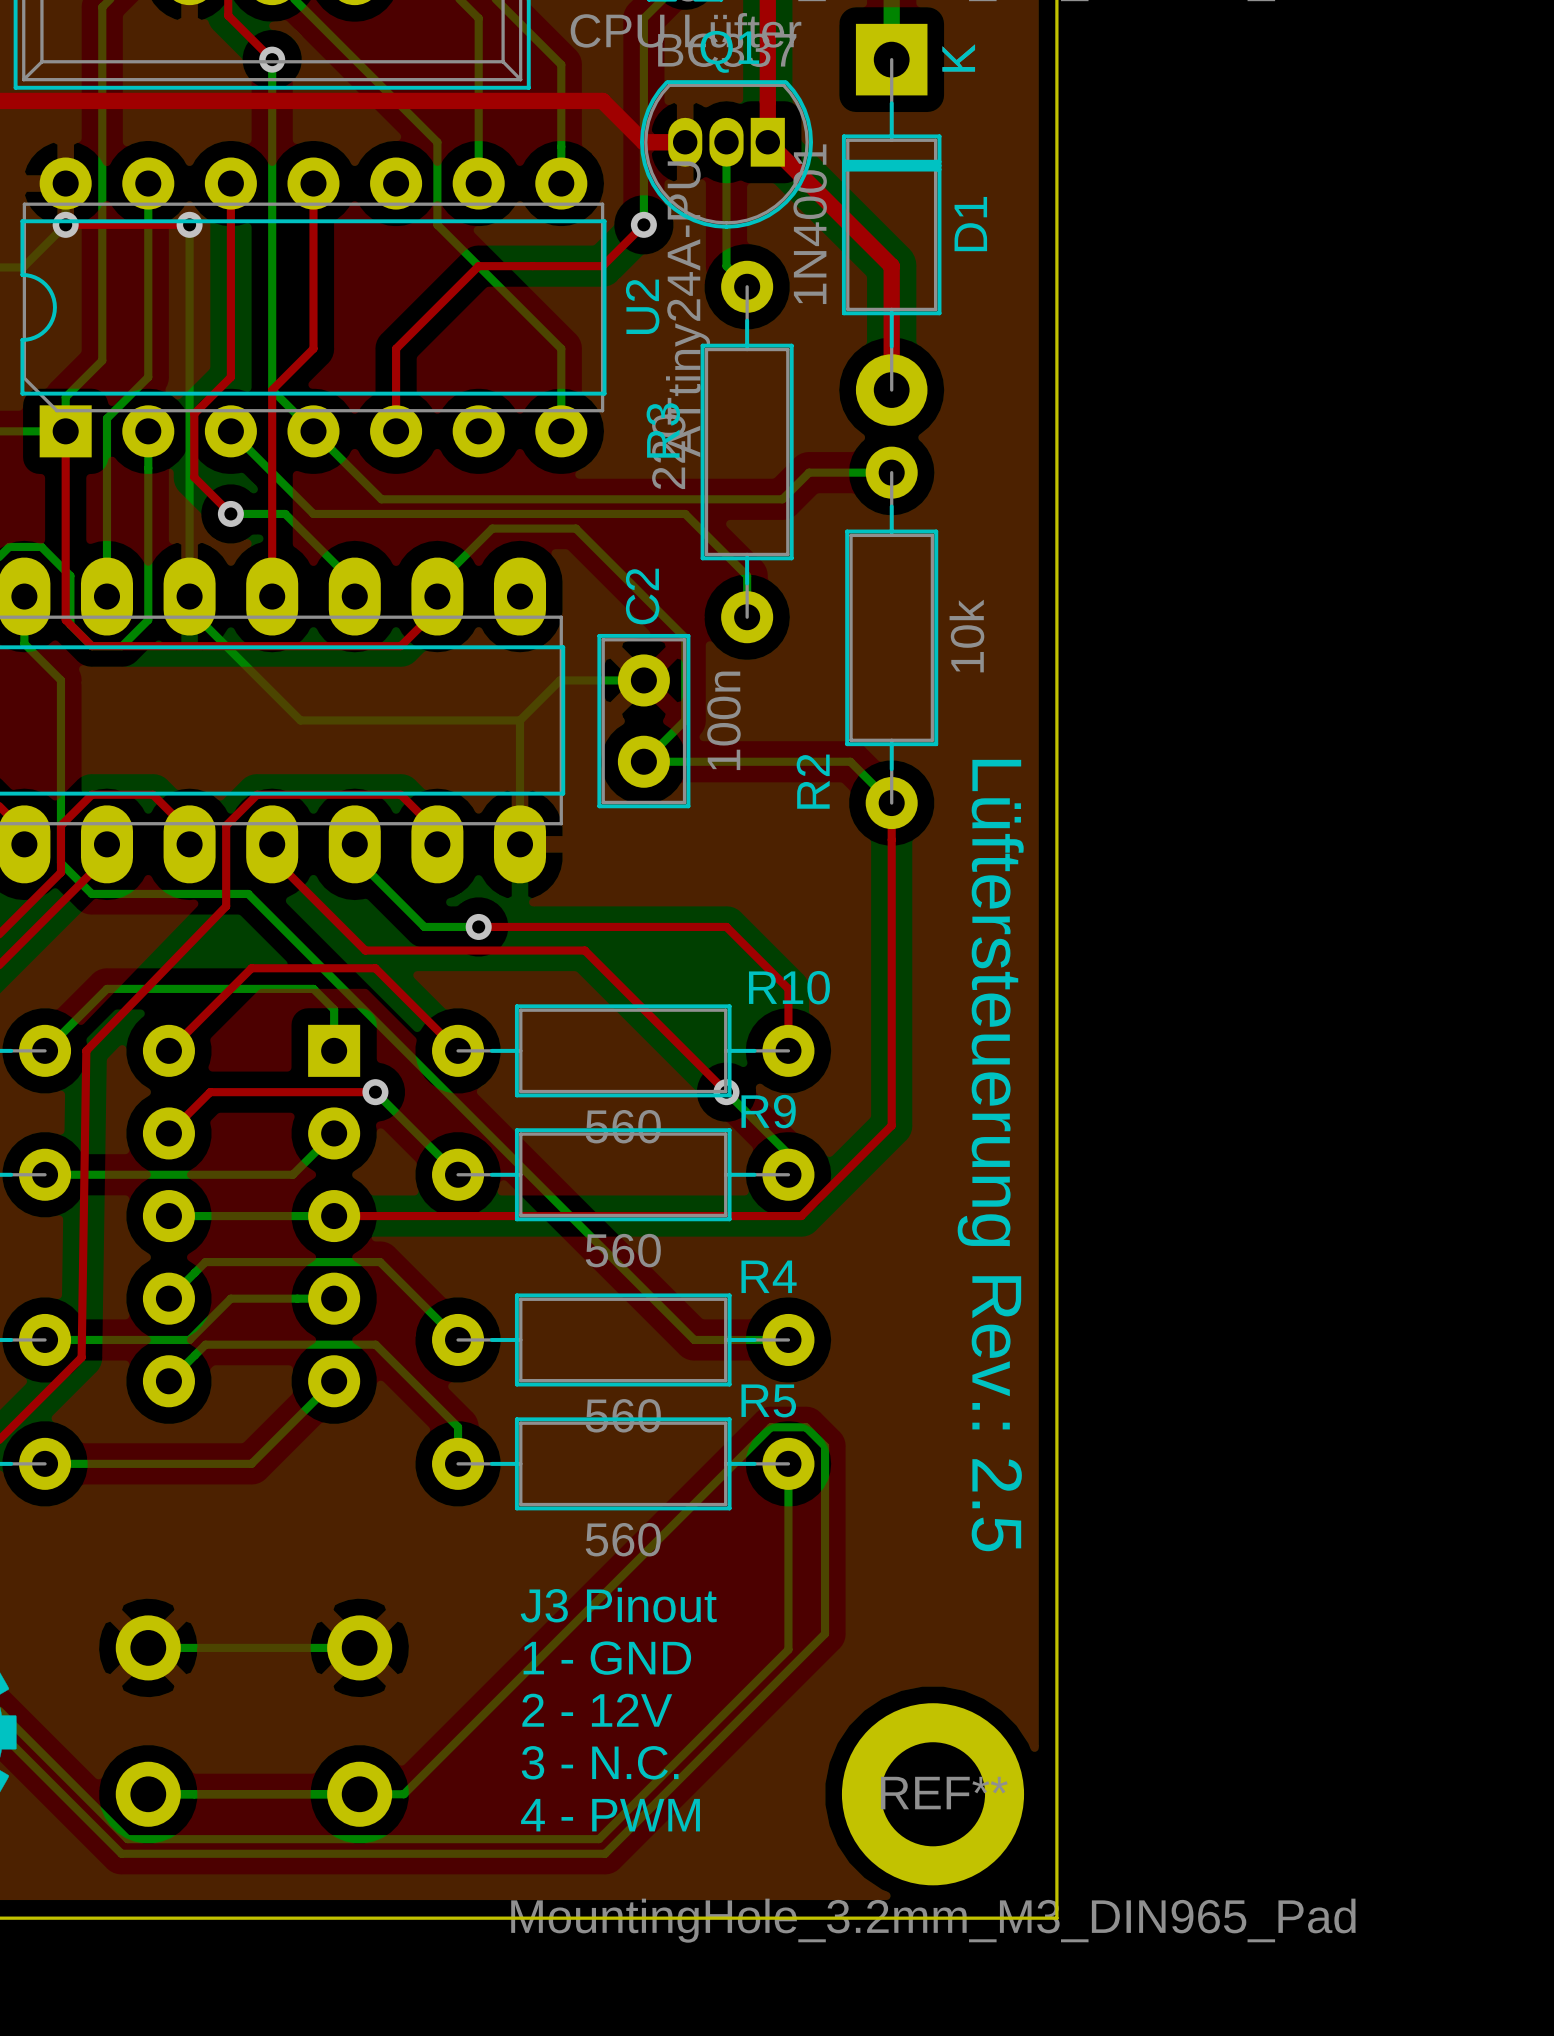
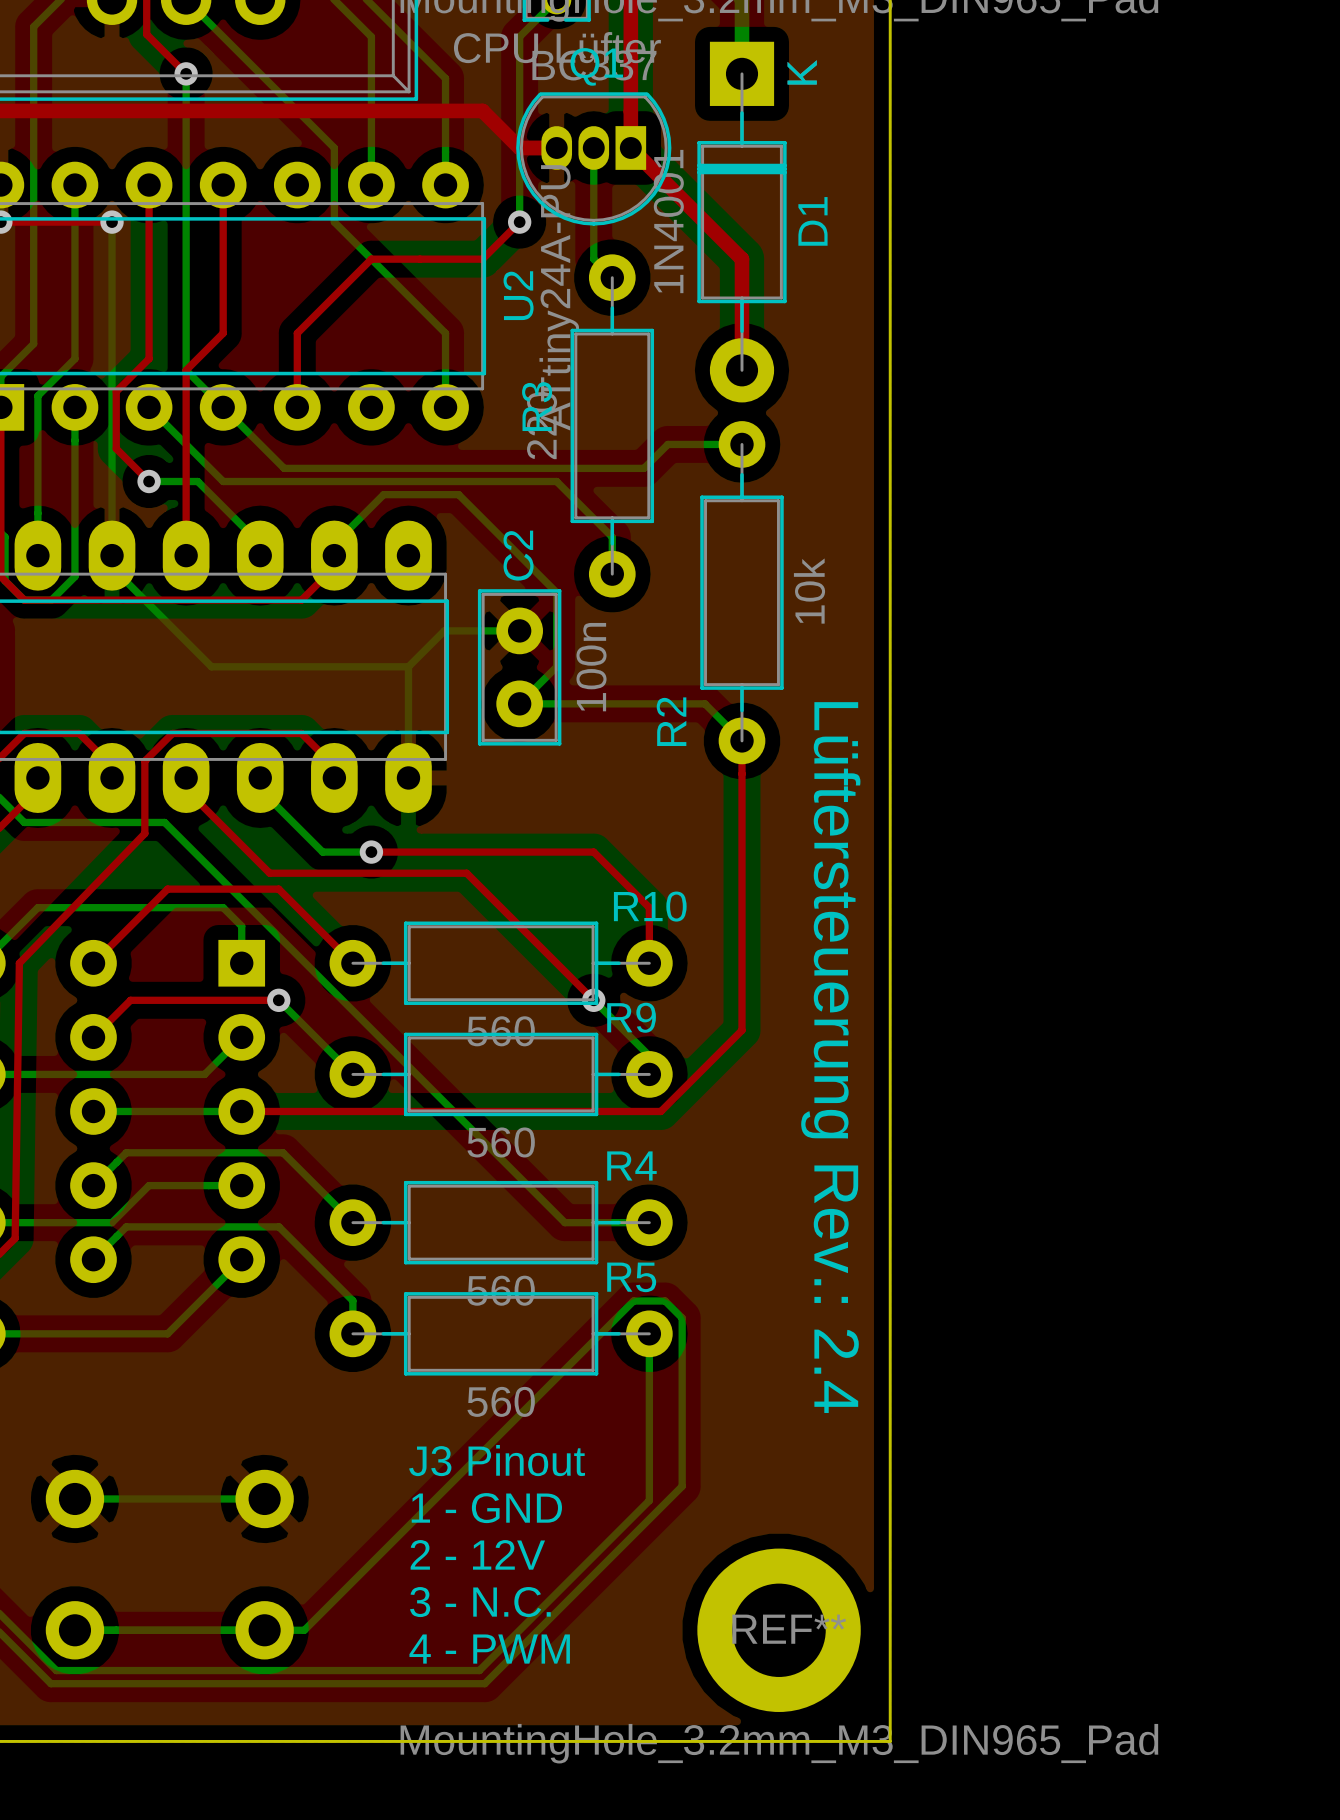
text: Lüftersteuerung Rev.: 2.5 (990, 1155) -> Lüftersteuerung Rev.: 2.4 (830, 1057)

